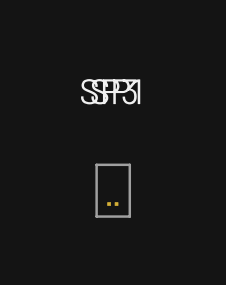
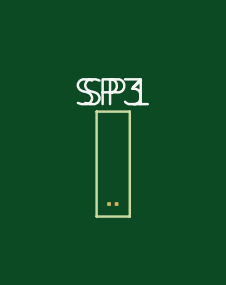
board edge: (129, 164) (96, 164) -> (129, 164) (129, 111) (96, 111) (96, 164)

